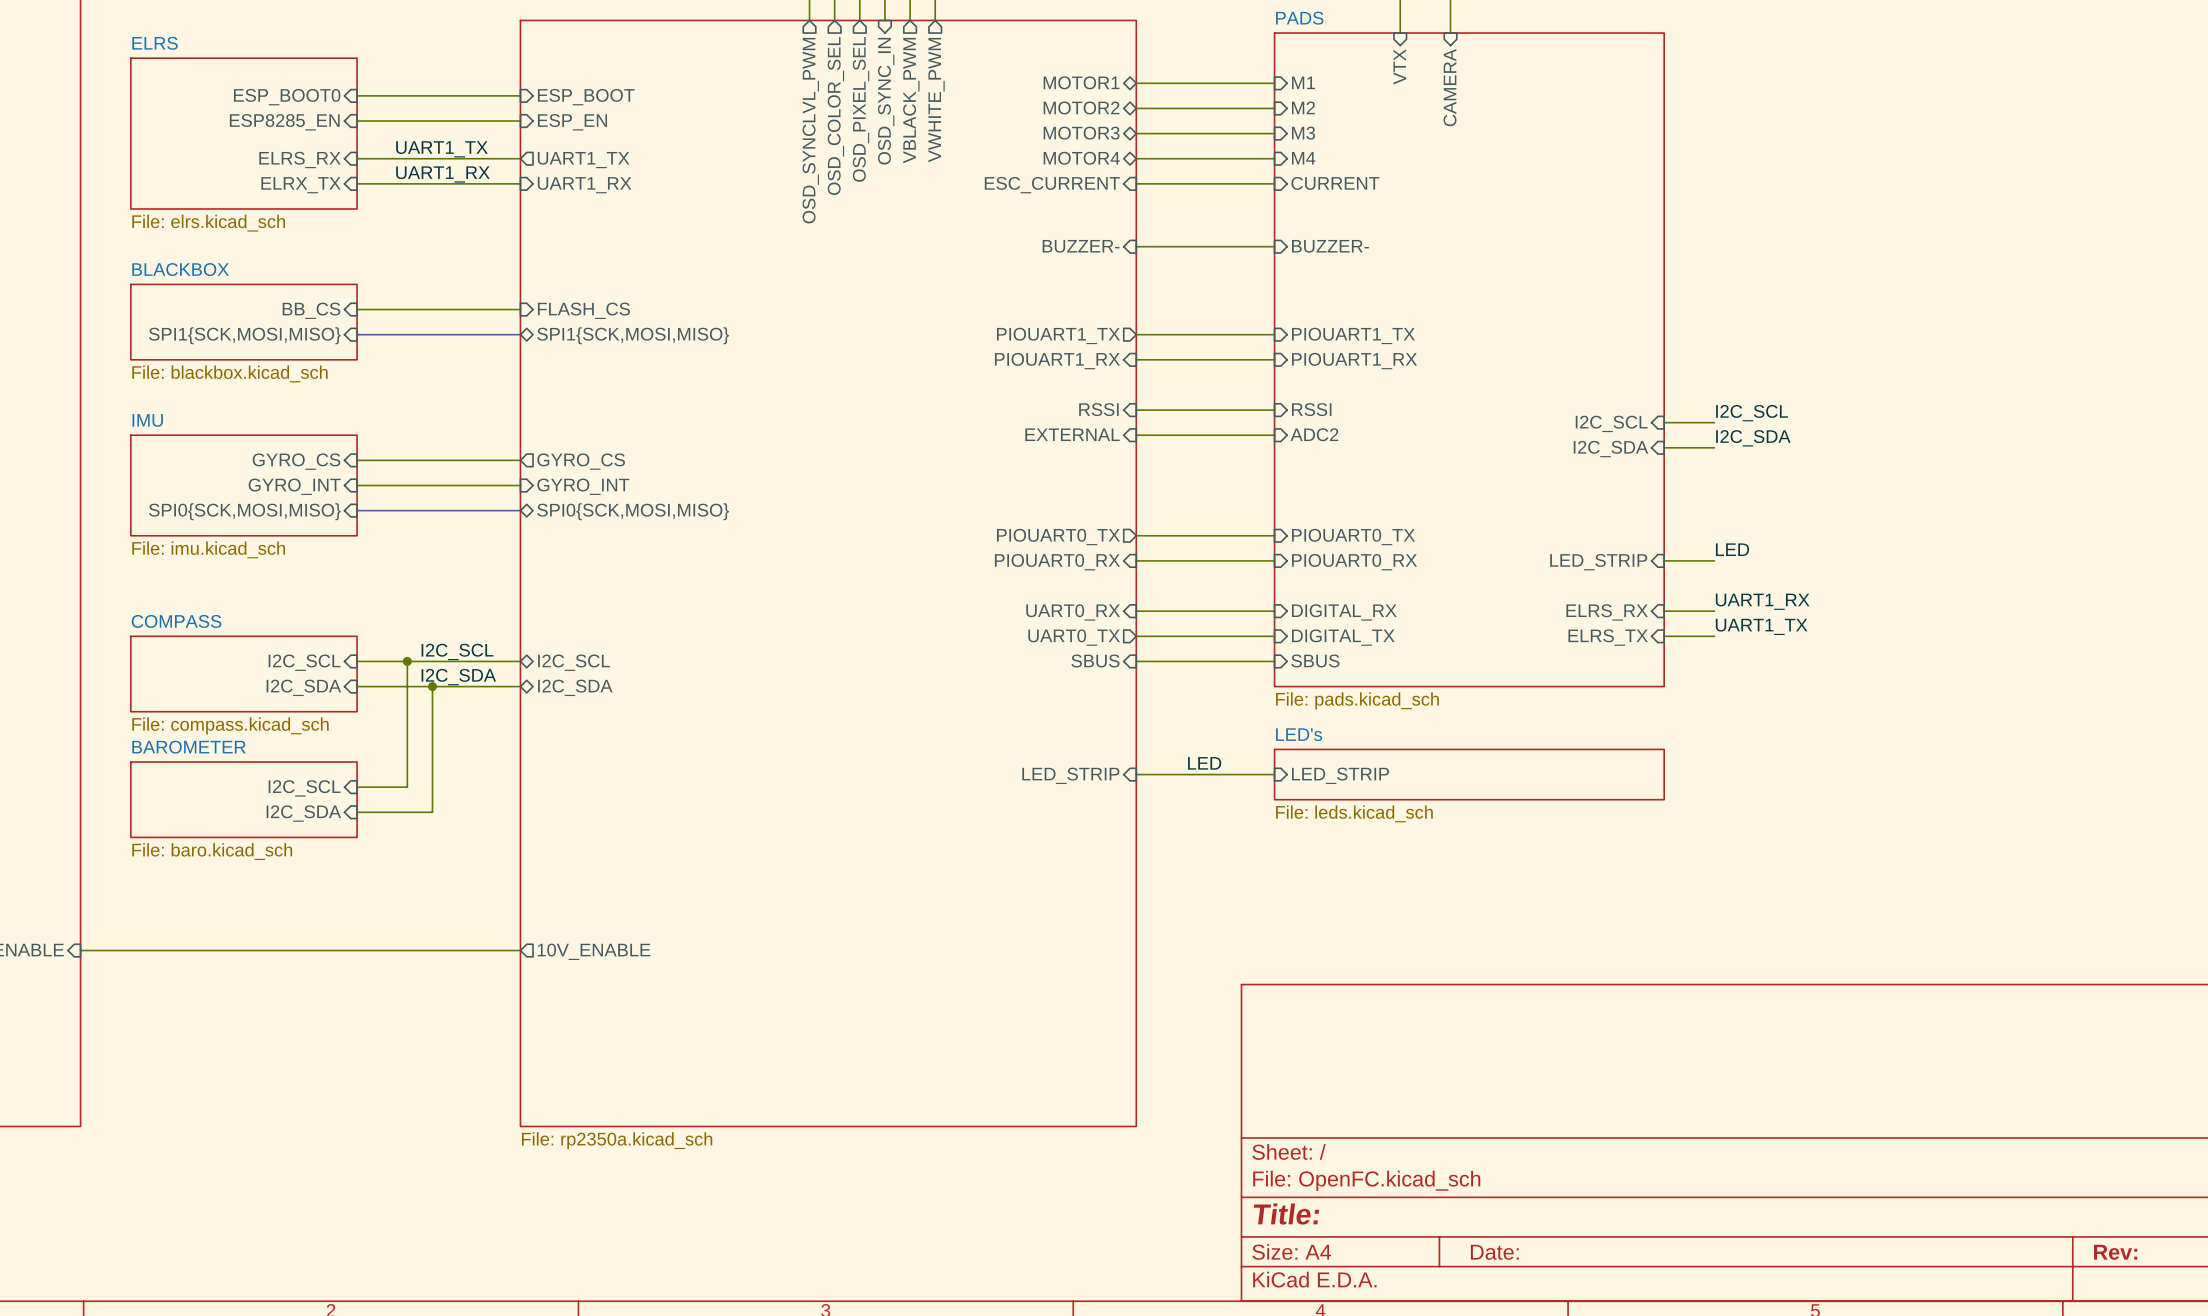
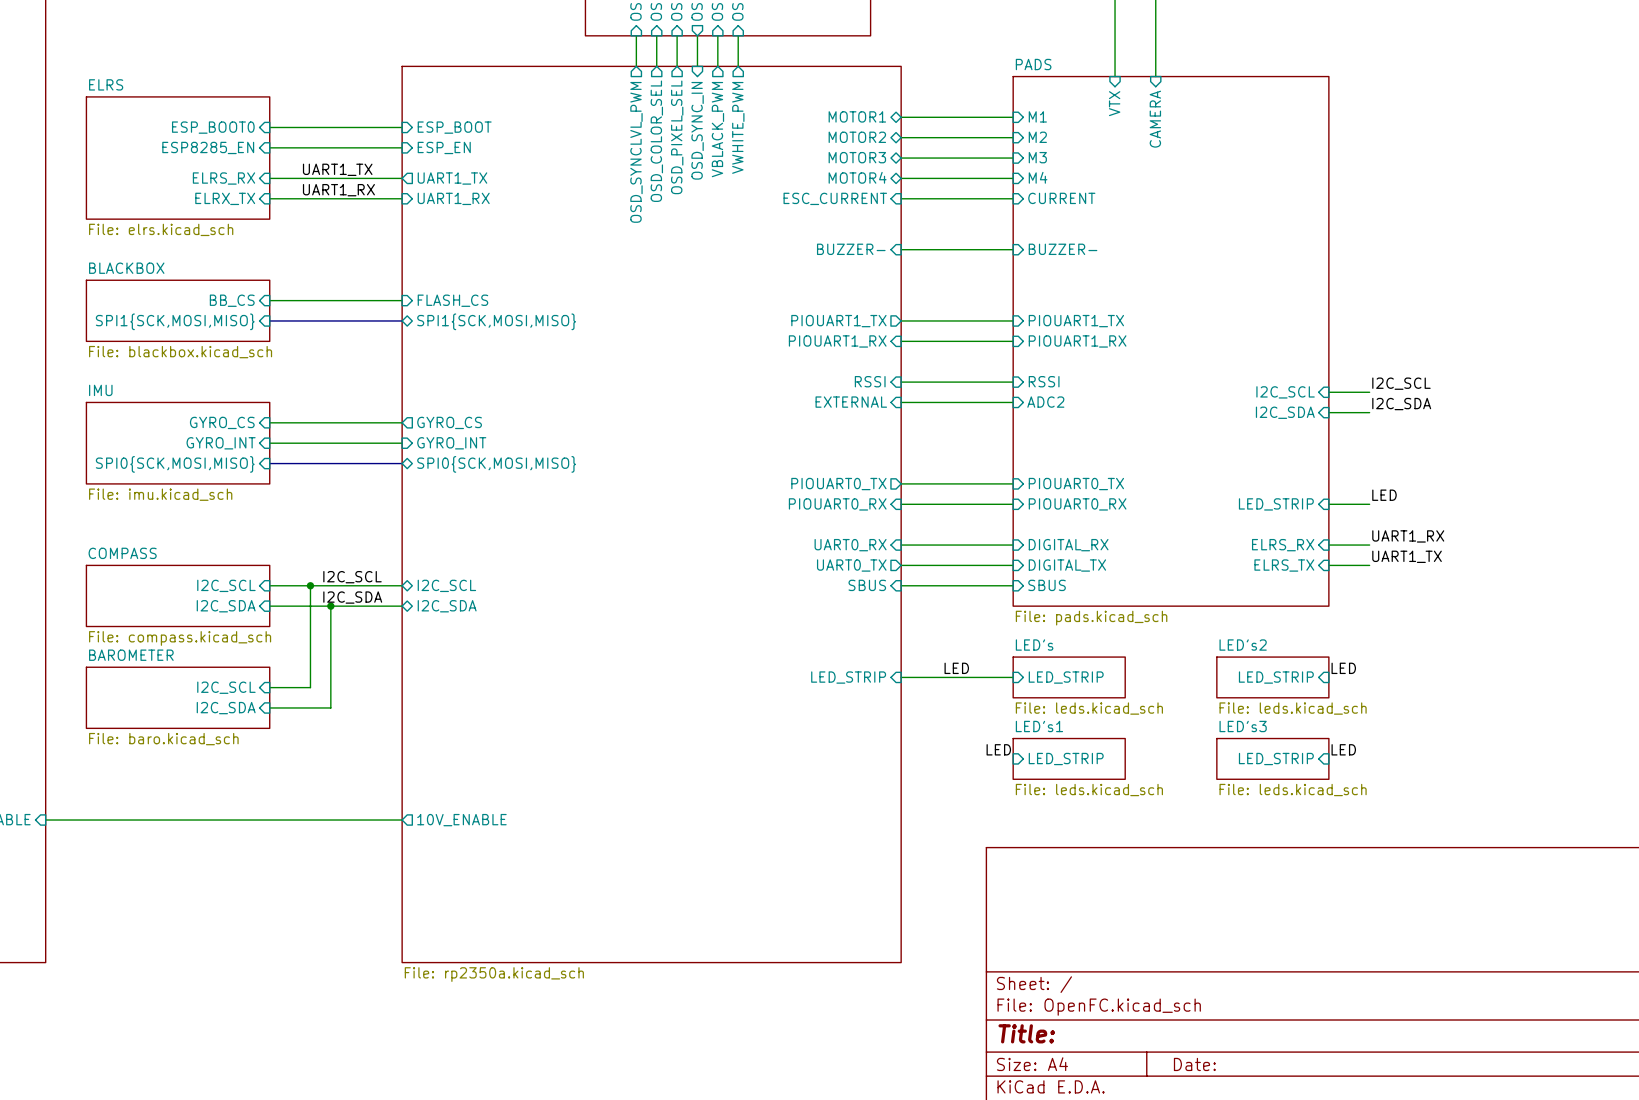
label: none -> LED (1343, 668)
sheet LED's: none -> File: leds.kicad_sch (1069, 677)
sheet LED's: File: leds.kicad_sch (1469, 774) -> none
sheet LED's2: none -> File: leds.kicad_sch (1272, 677)
sheet pin: none -> LED_STRIP (1276, 677)
label: none -> LED (998, 749)
label: none -> LED (1343, 749)
sheet LED's1: none -> File: leds.kicad_sch (1069, 758)
sheet LED's3: none -> File: leds.kicad_sch (1272, 758)
sheet pin: none -> LED_STRIP (1066, 759)
sheet pin: none -> LED_STRIP (1276, 759)

